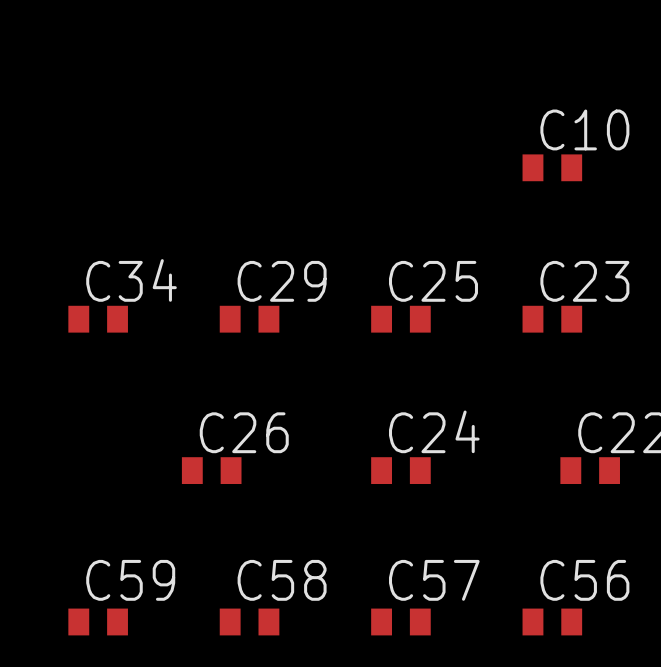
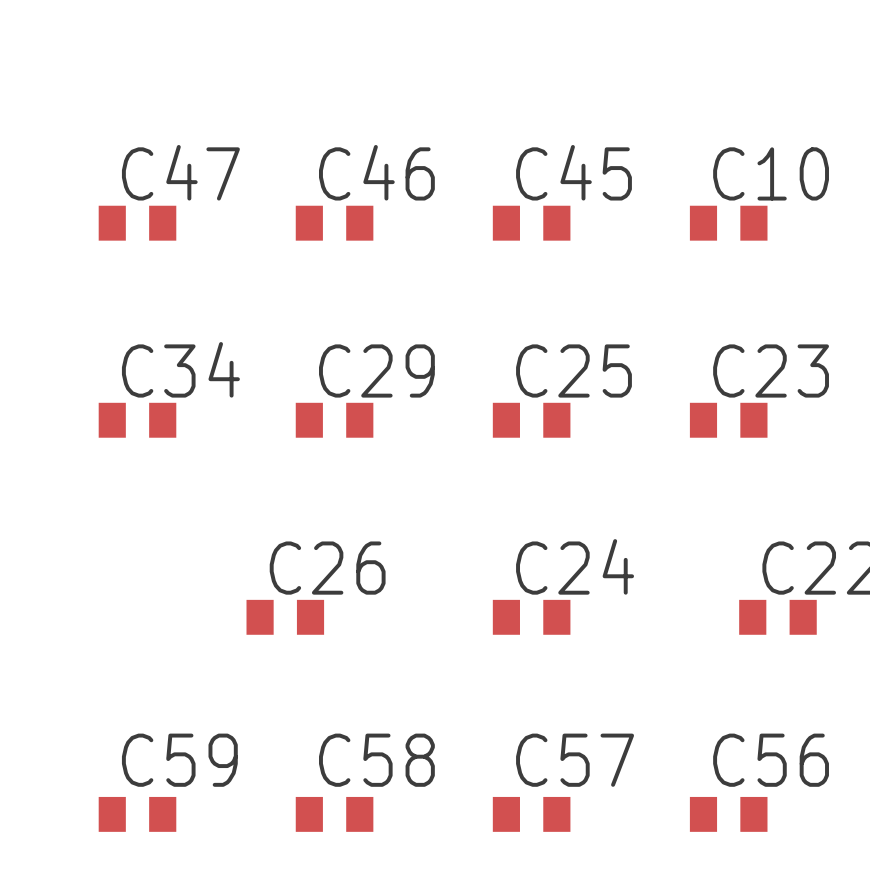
C47: none -> (137, 223)
C46: none -> (334, 223)
C45: none -> (531, 223)

